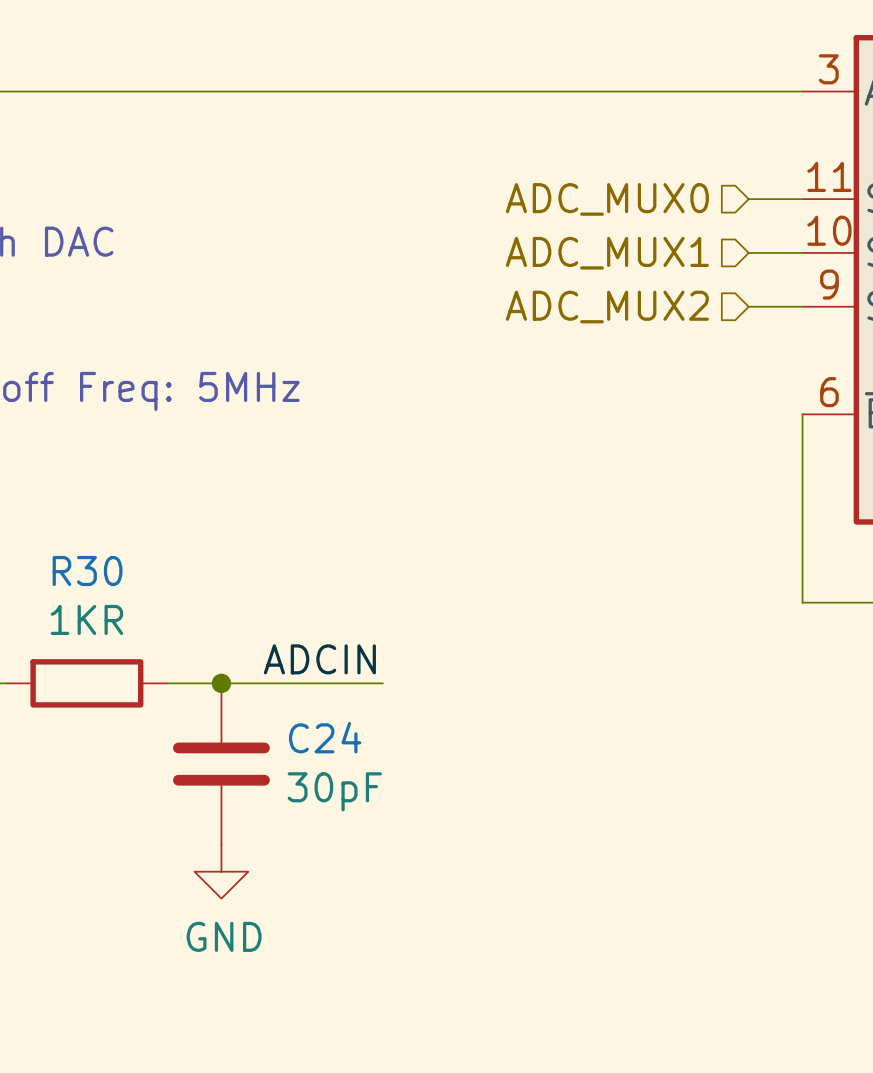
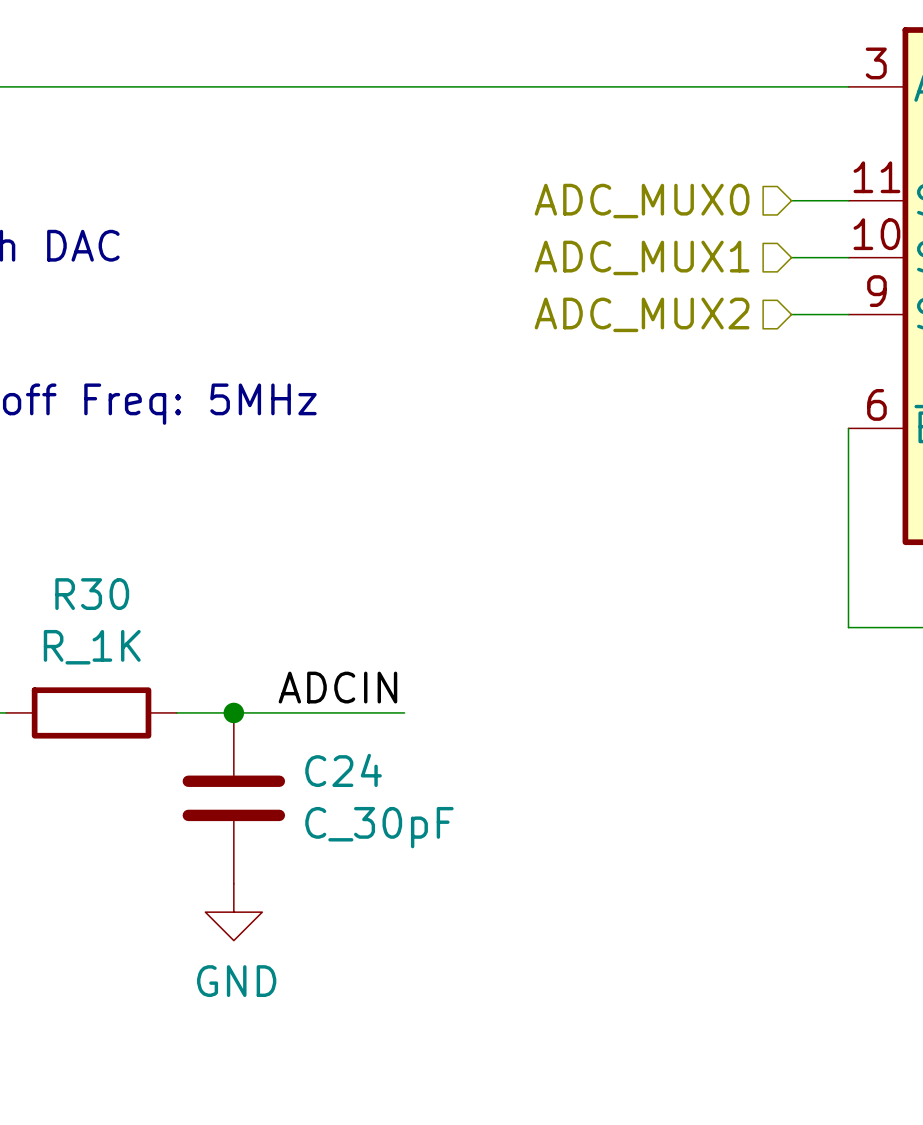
R30 value: 1KR (86, 619) -> R_1K (92, 647)
C24 value: 30pF (334, 791) -> C_30pF (379, 827)

